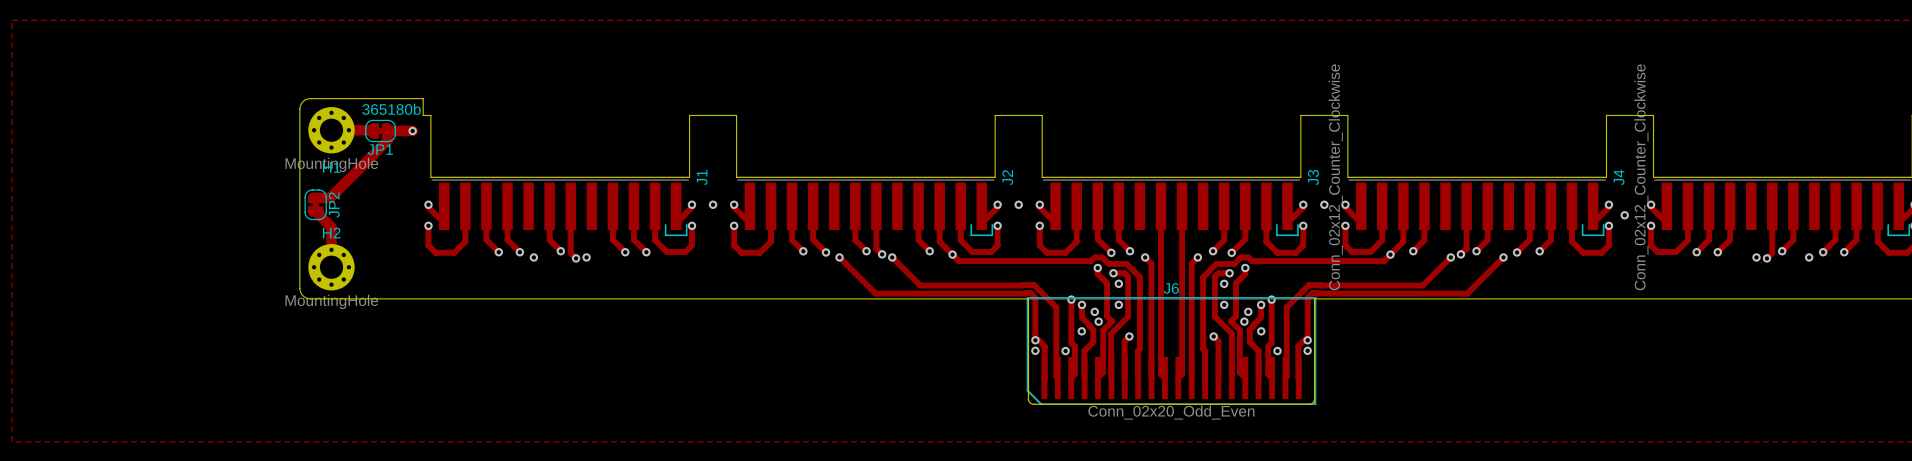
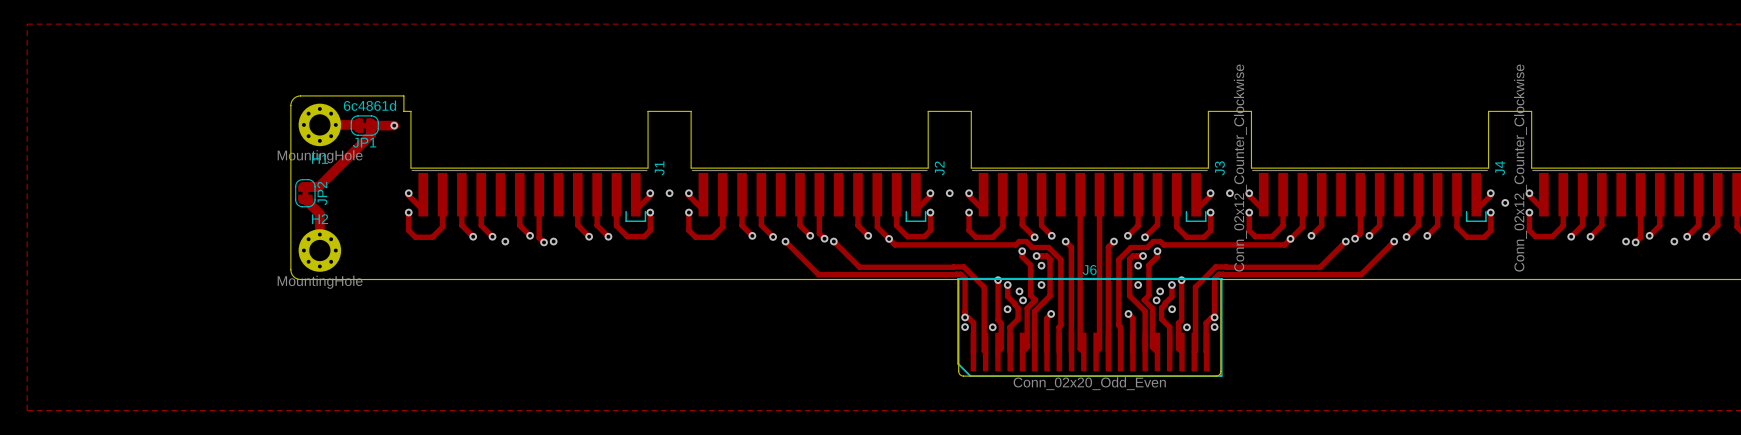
text: 365180b (391, 109) -> 6c4861d (370, 105)

